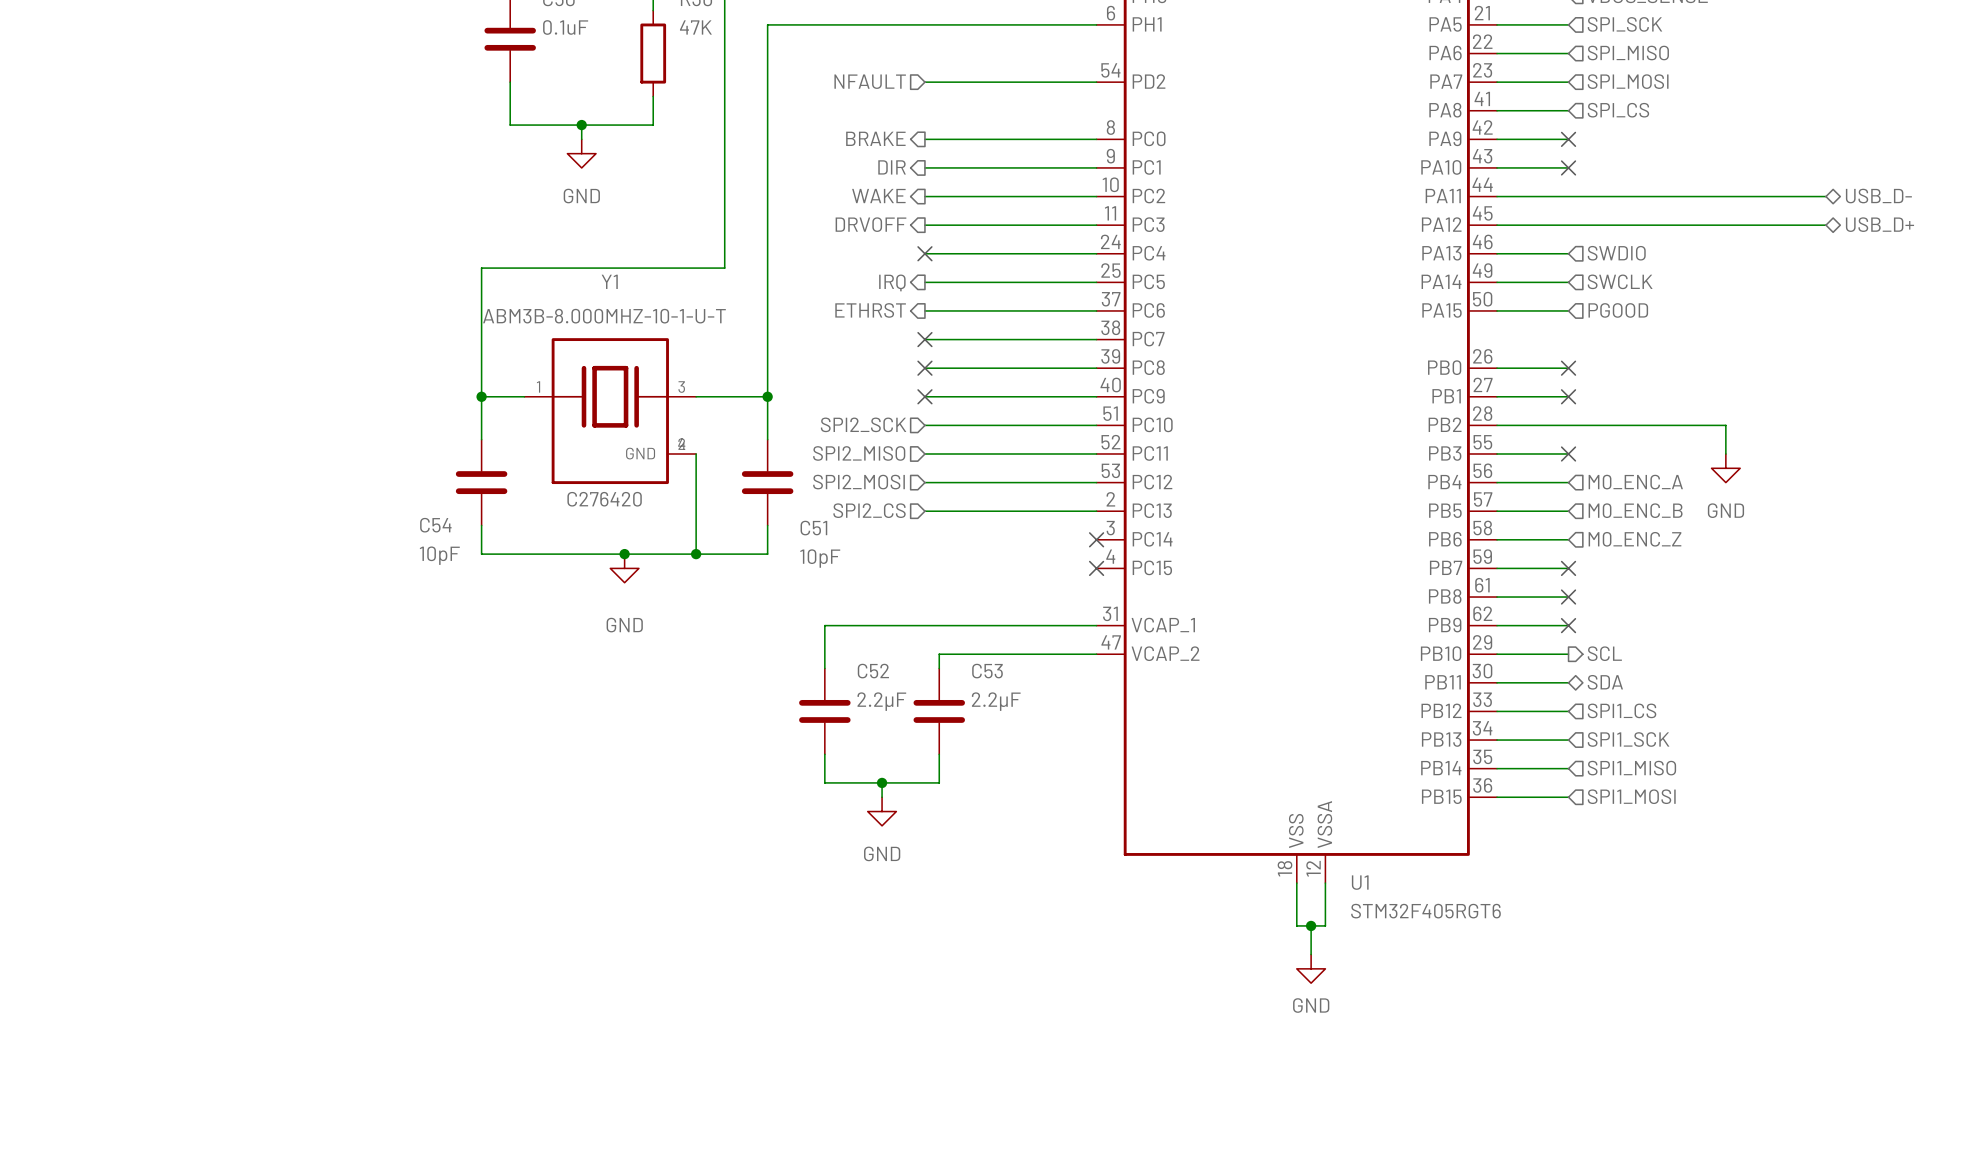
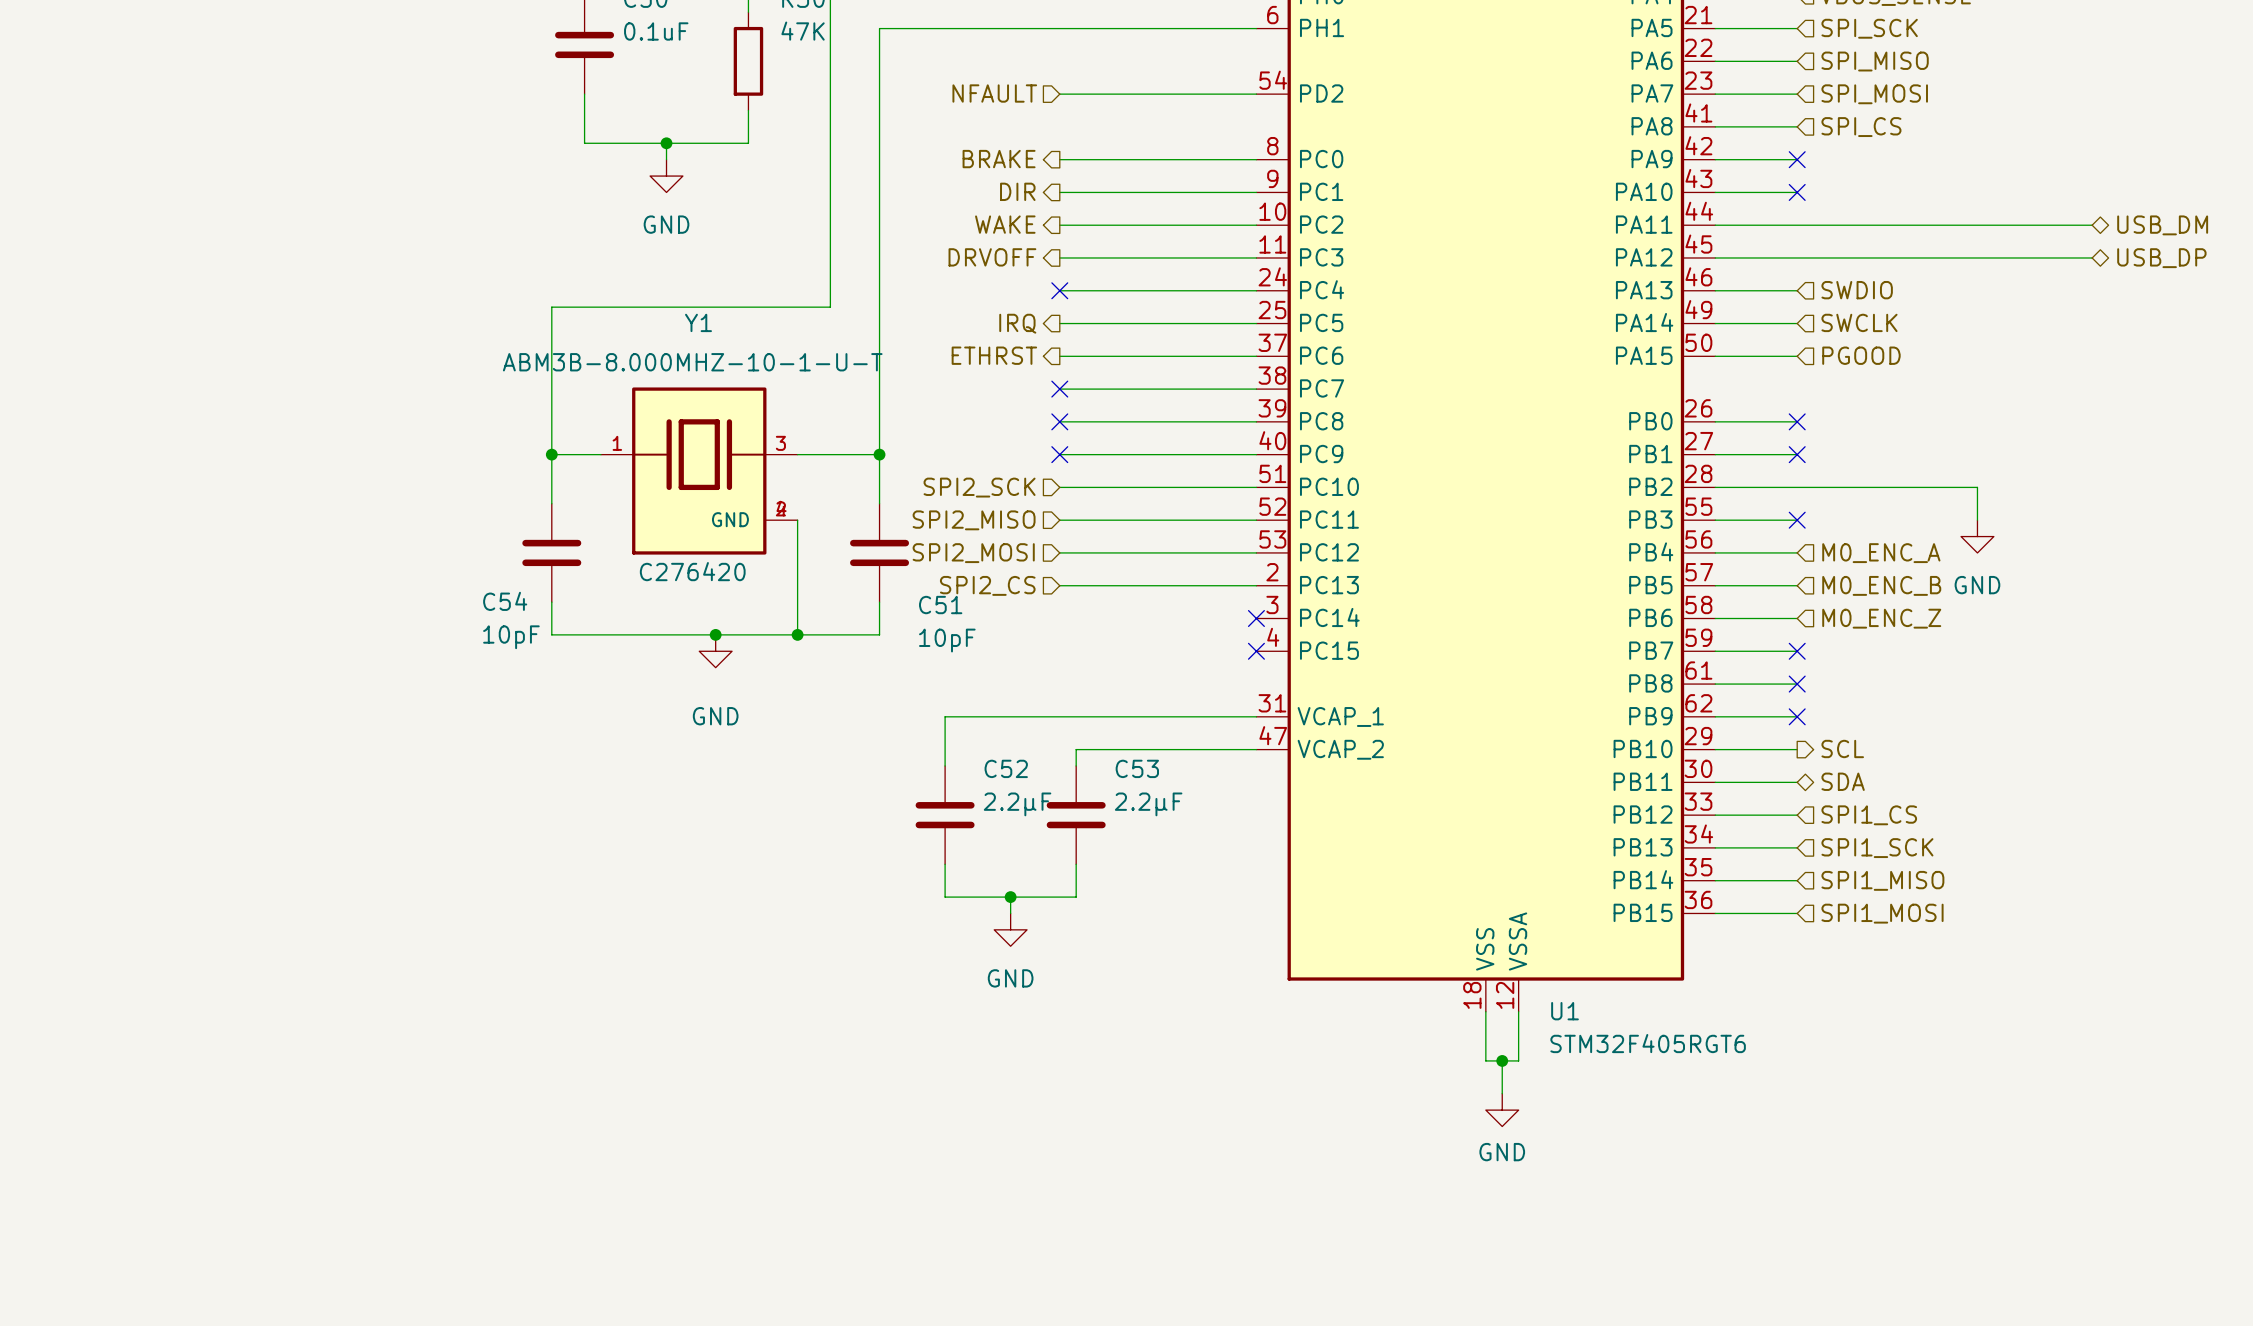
hierarchical label: USB_D- (1878, 196) -> USB_DM (2162, 225)
hierarchical label: USB_D+ (1879, 224) -> USB_DP (2161, 258)

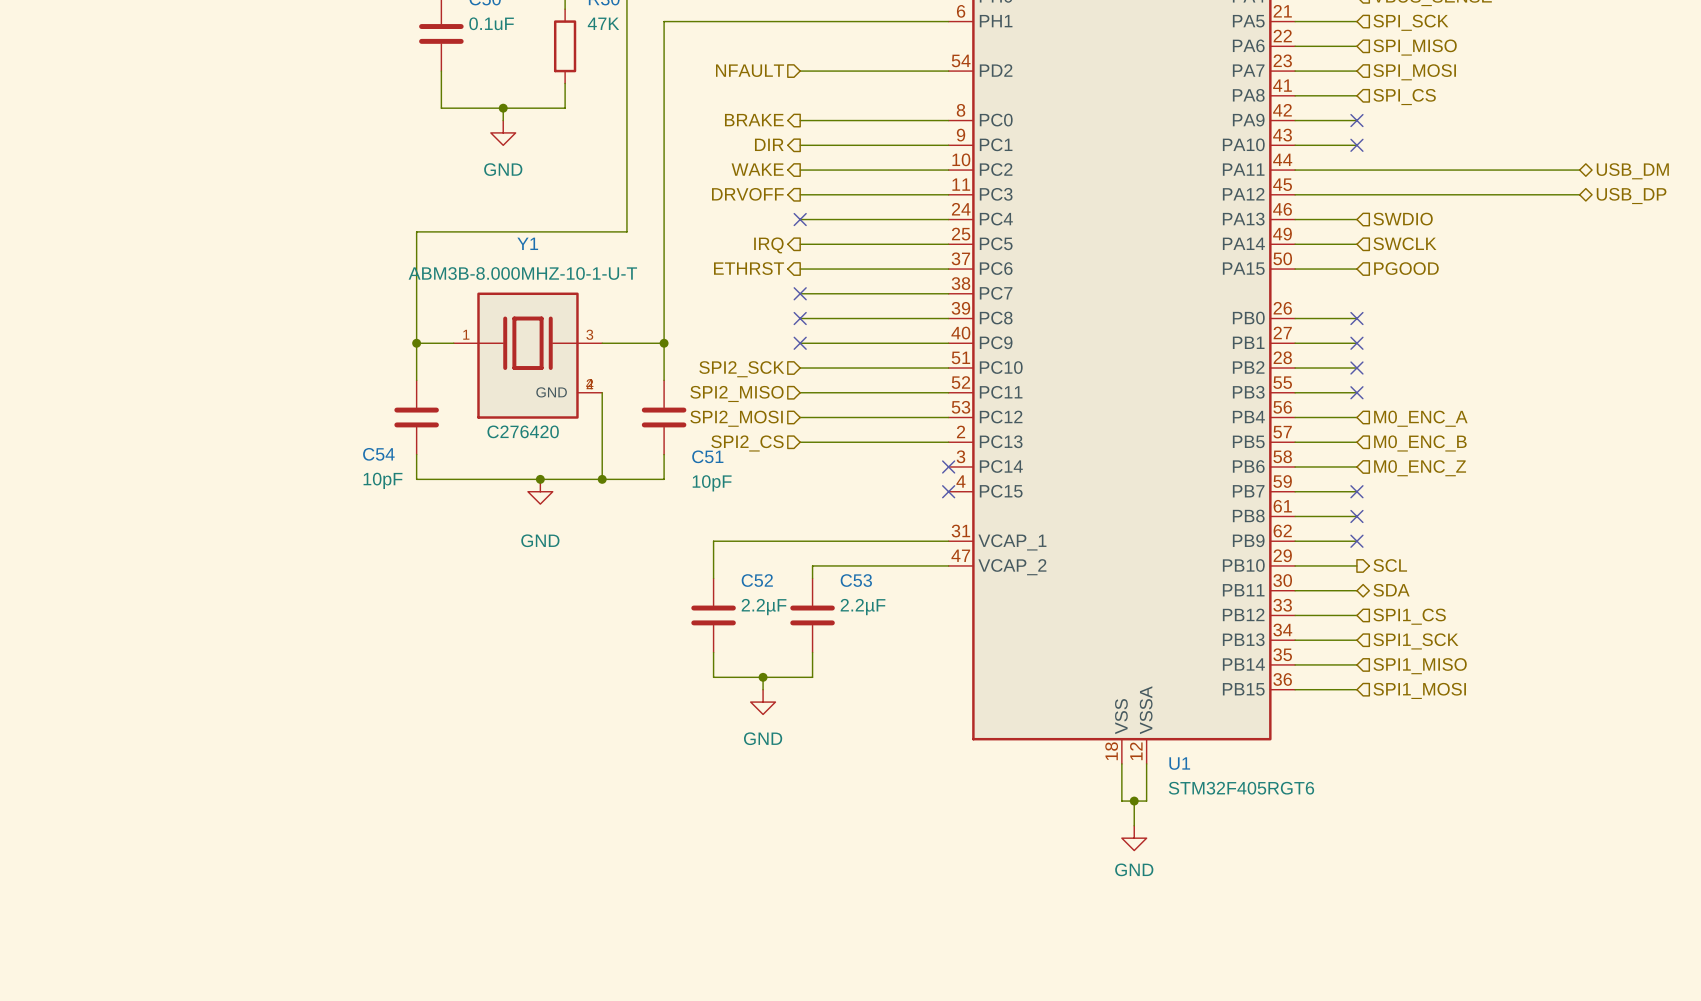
wire: (1797, 487) (1977, 487) (1977, 520) -> none
no-connect mark: none -> (1356, 368)
power symbol: GND (1977, 536) -> none

